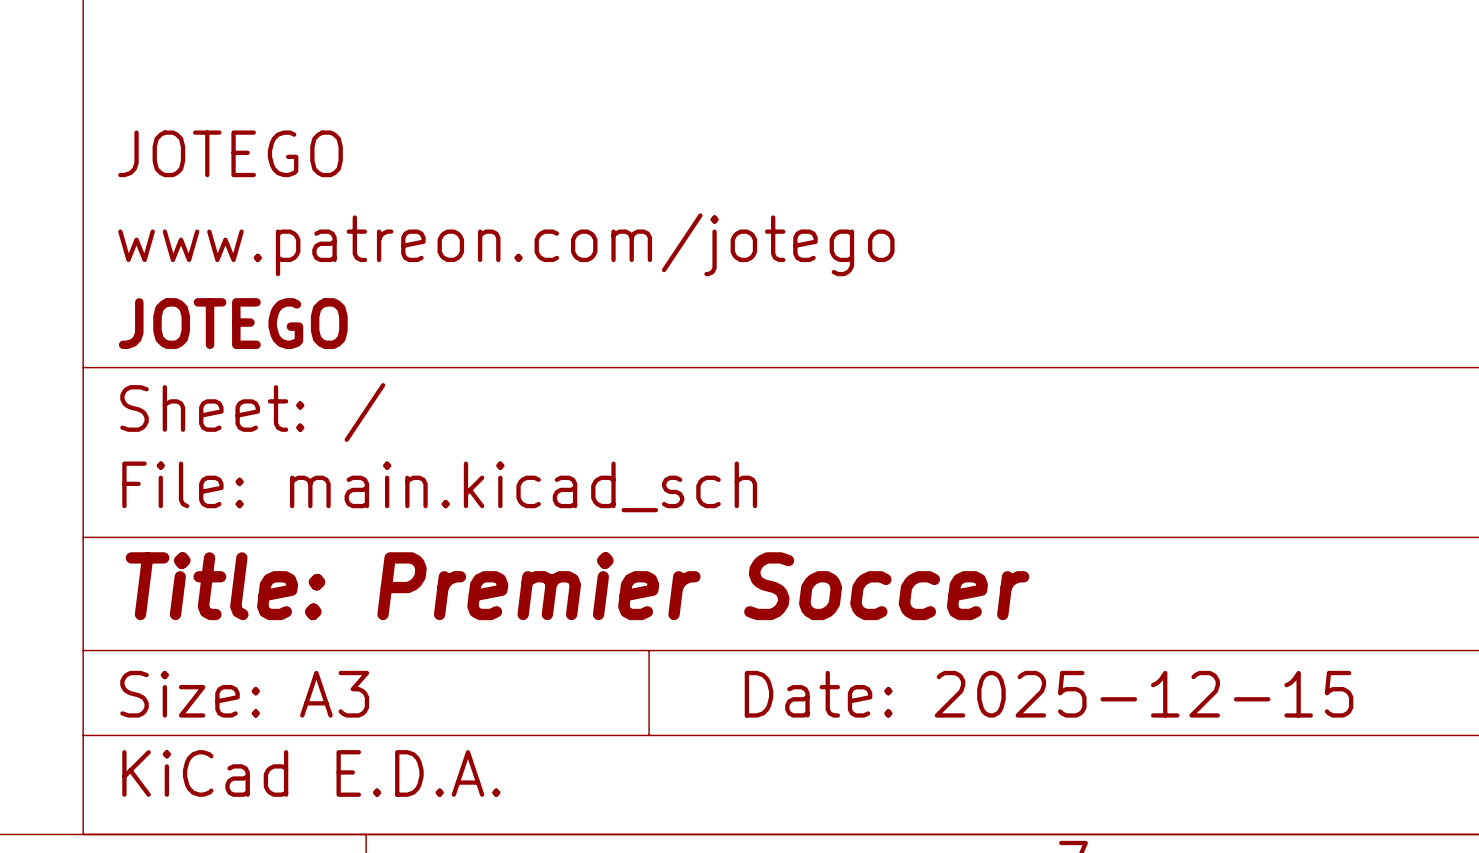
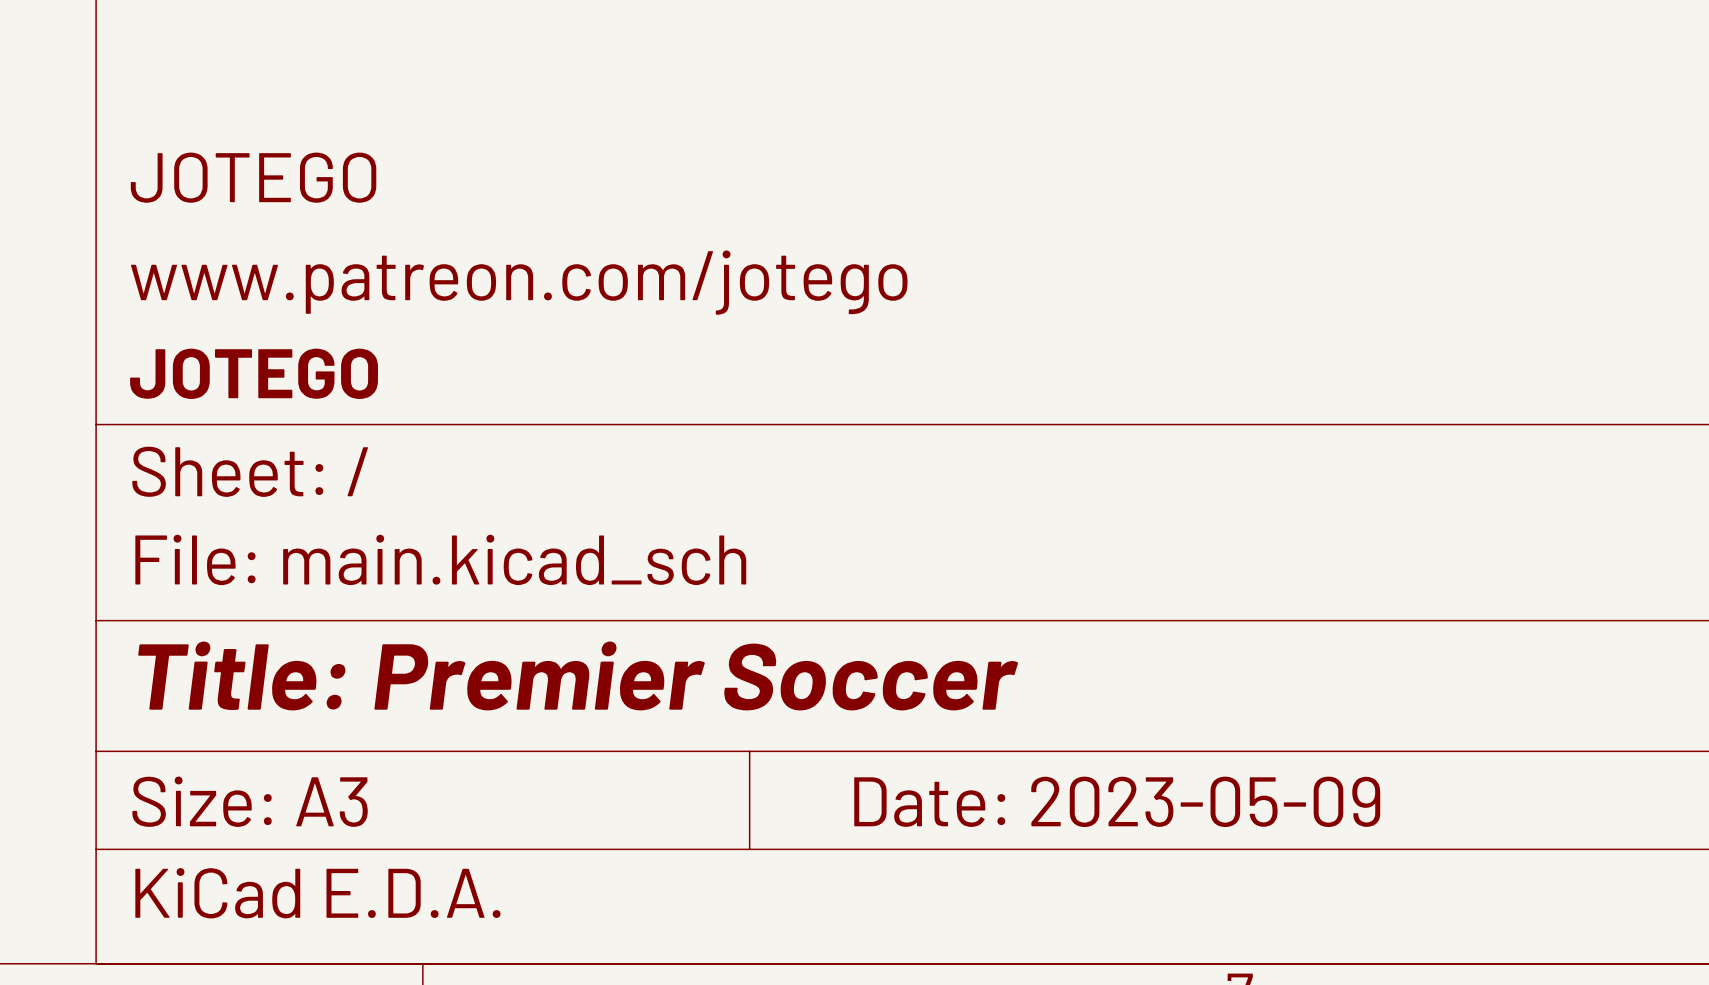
title block: Date: 2025-12-15 (1049, 694) -> Date: 2023-05-09 (1117, 801)

